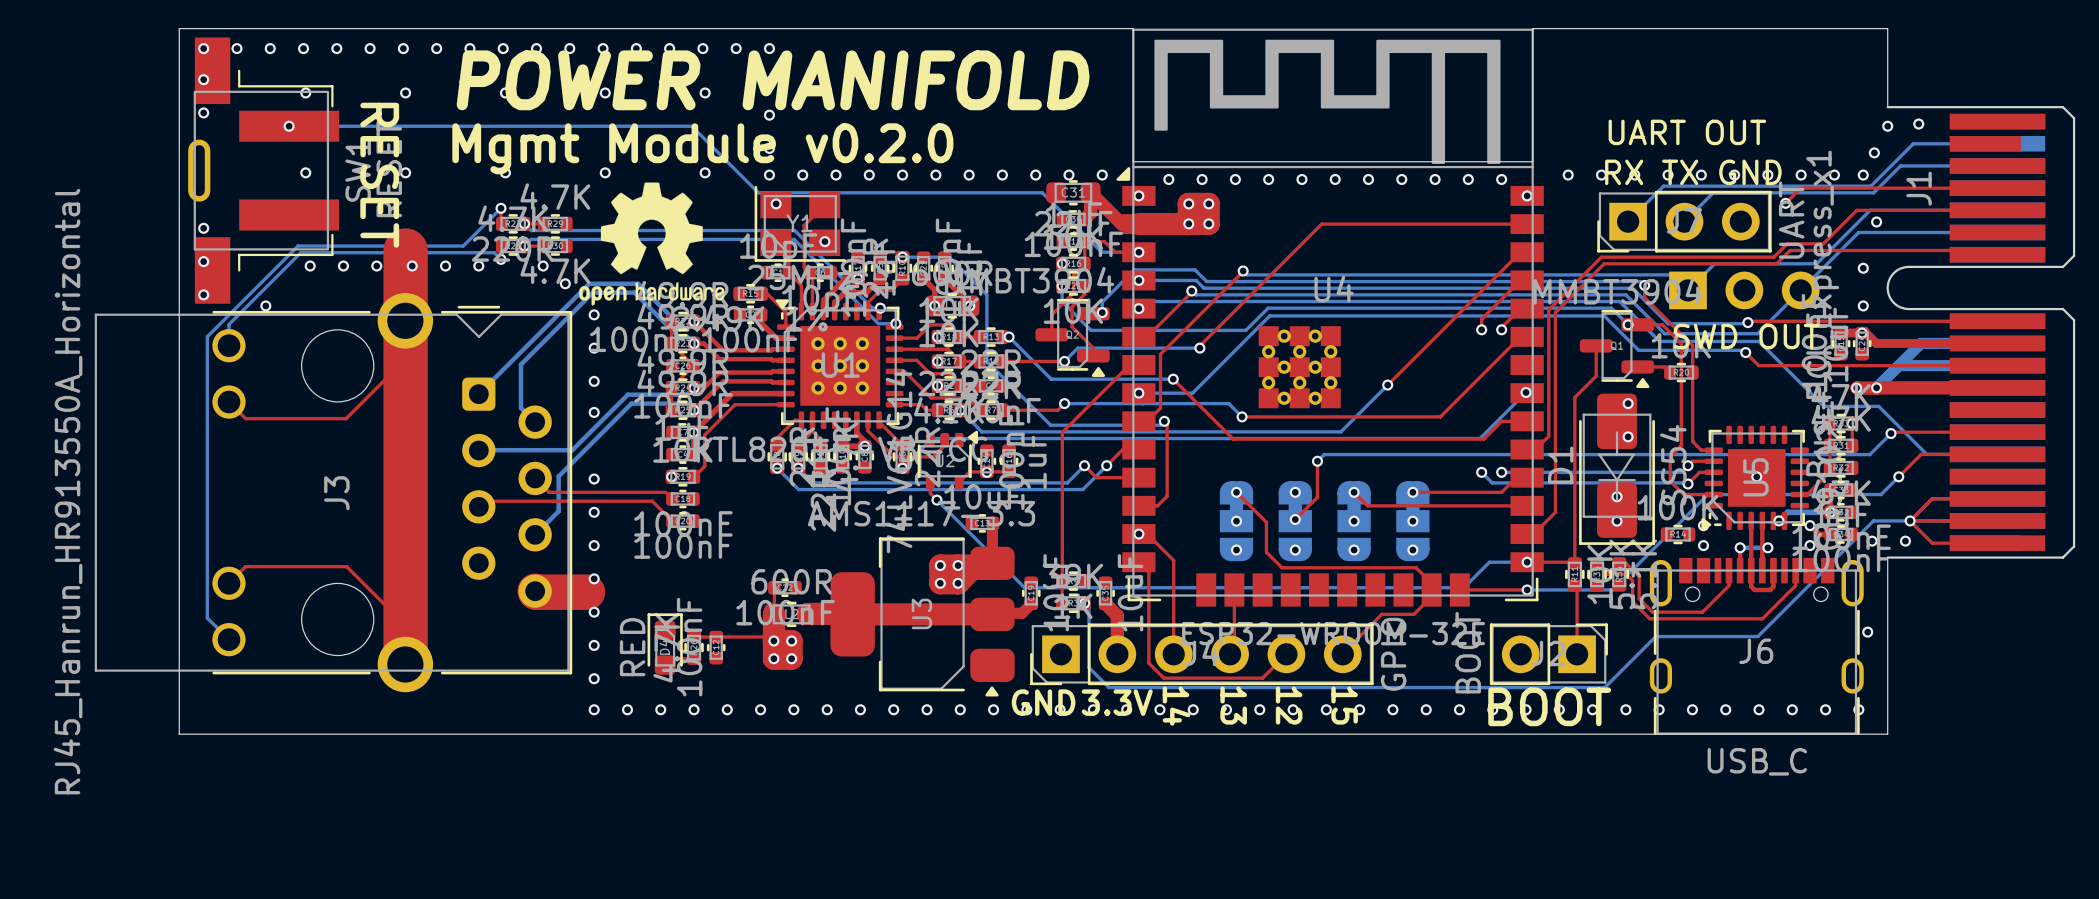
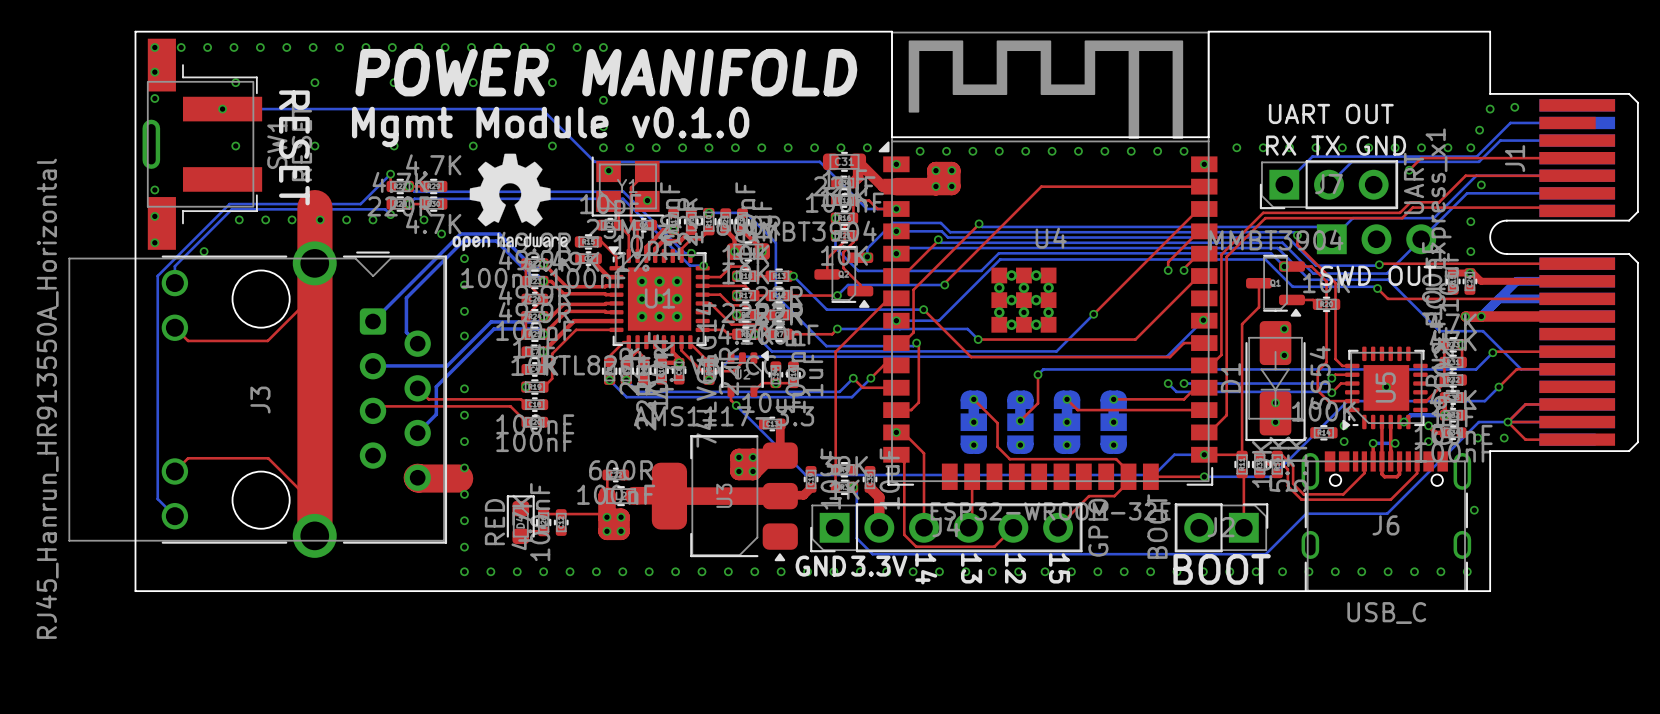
text: Mgmt Module v0.2.0 (702, 148) -> Mgmt Module v0.1.0 (550, 126)

